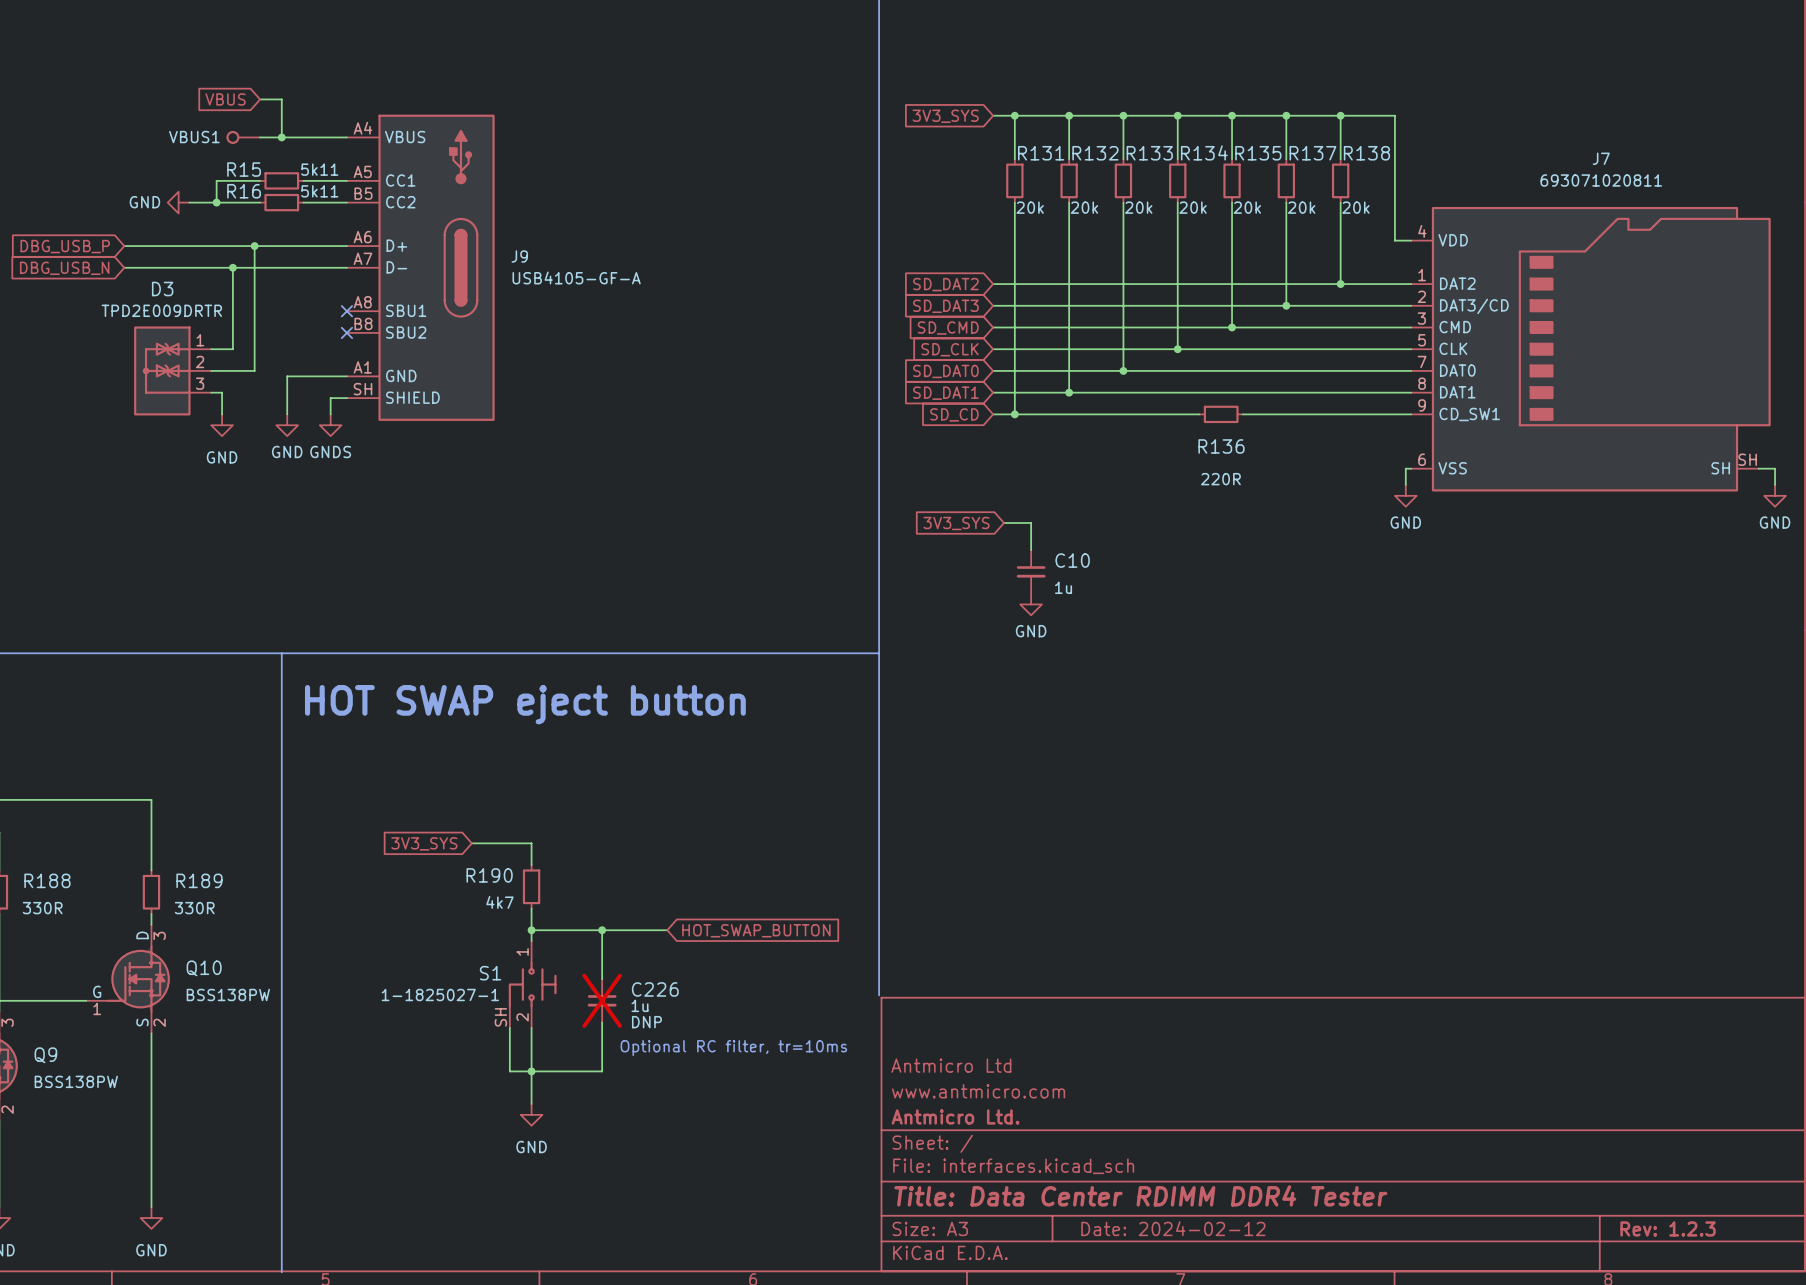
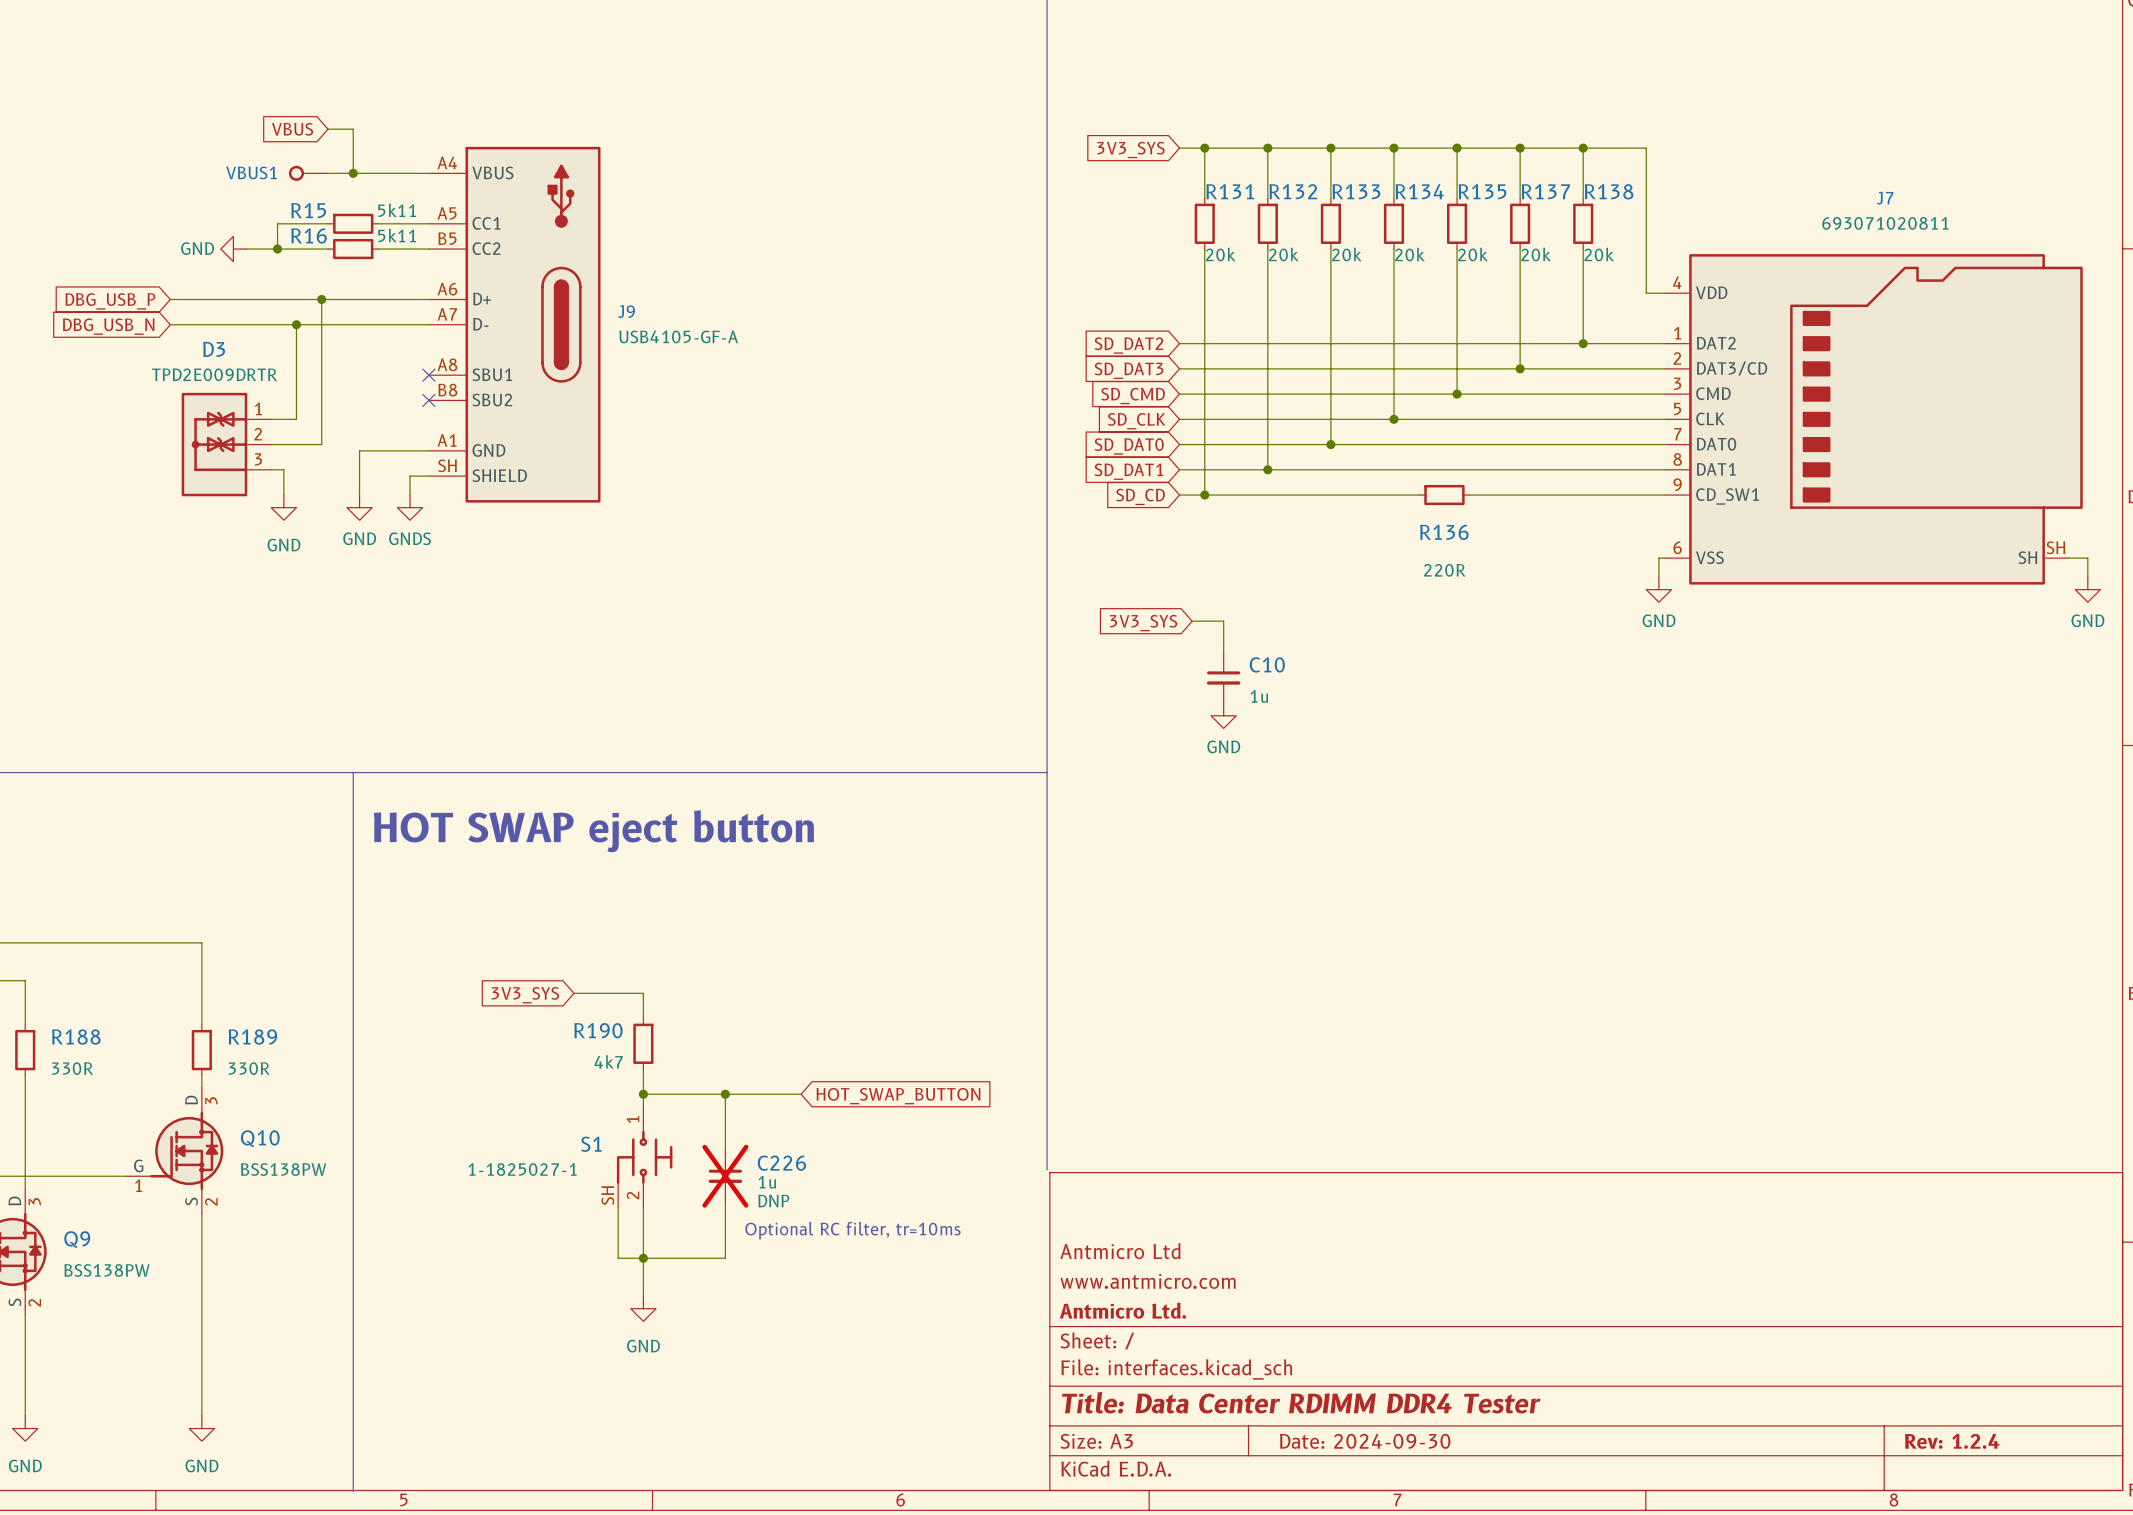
title block: Date: 2024-02-12 (1173, 1228) -> Date: 2024-09-30 (1365, 1441)
title block: Rev: 1.2.3 (1668, 1228) -> Rev: 1.2.4 (1952, 1441)

